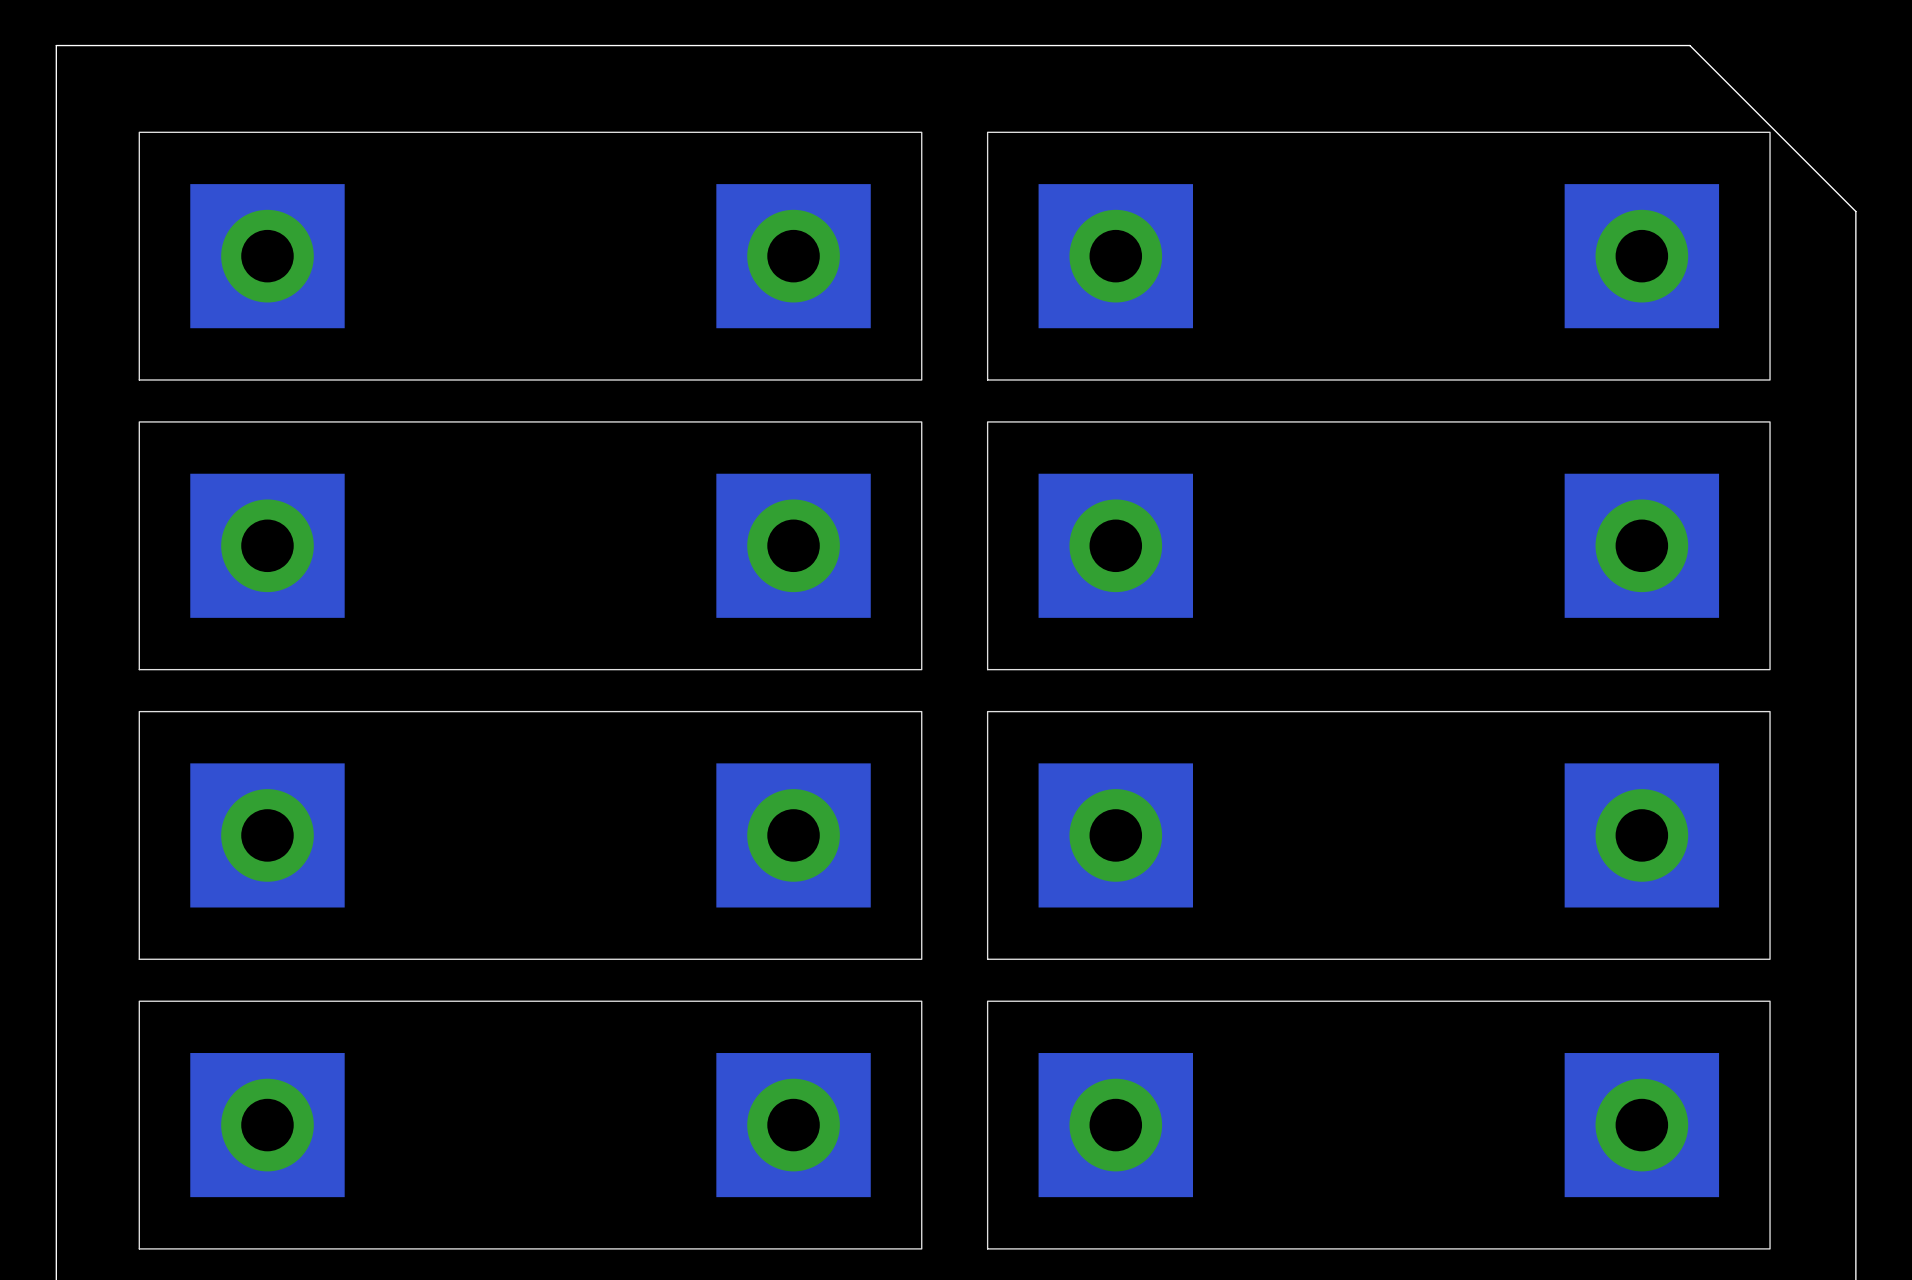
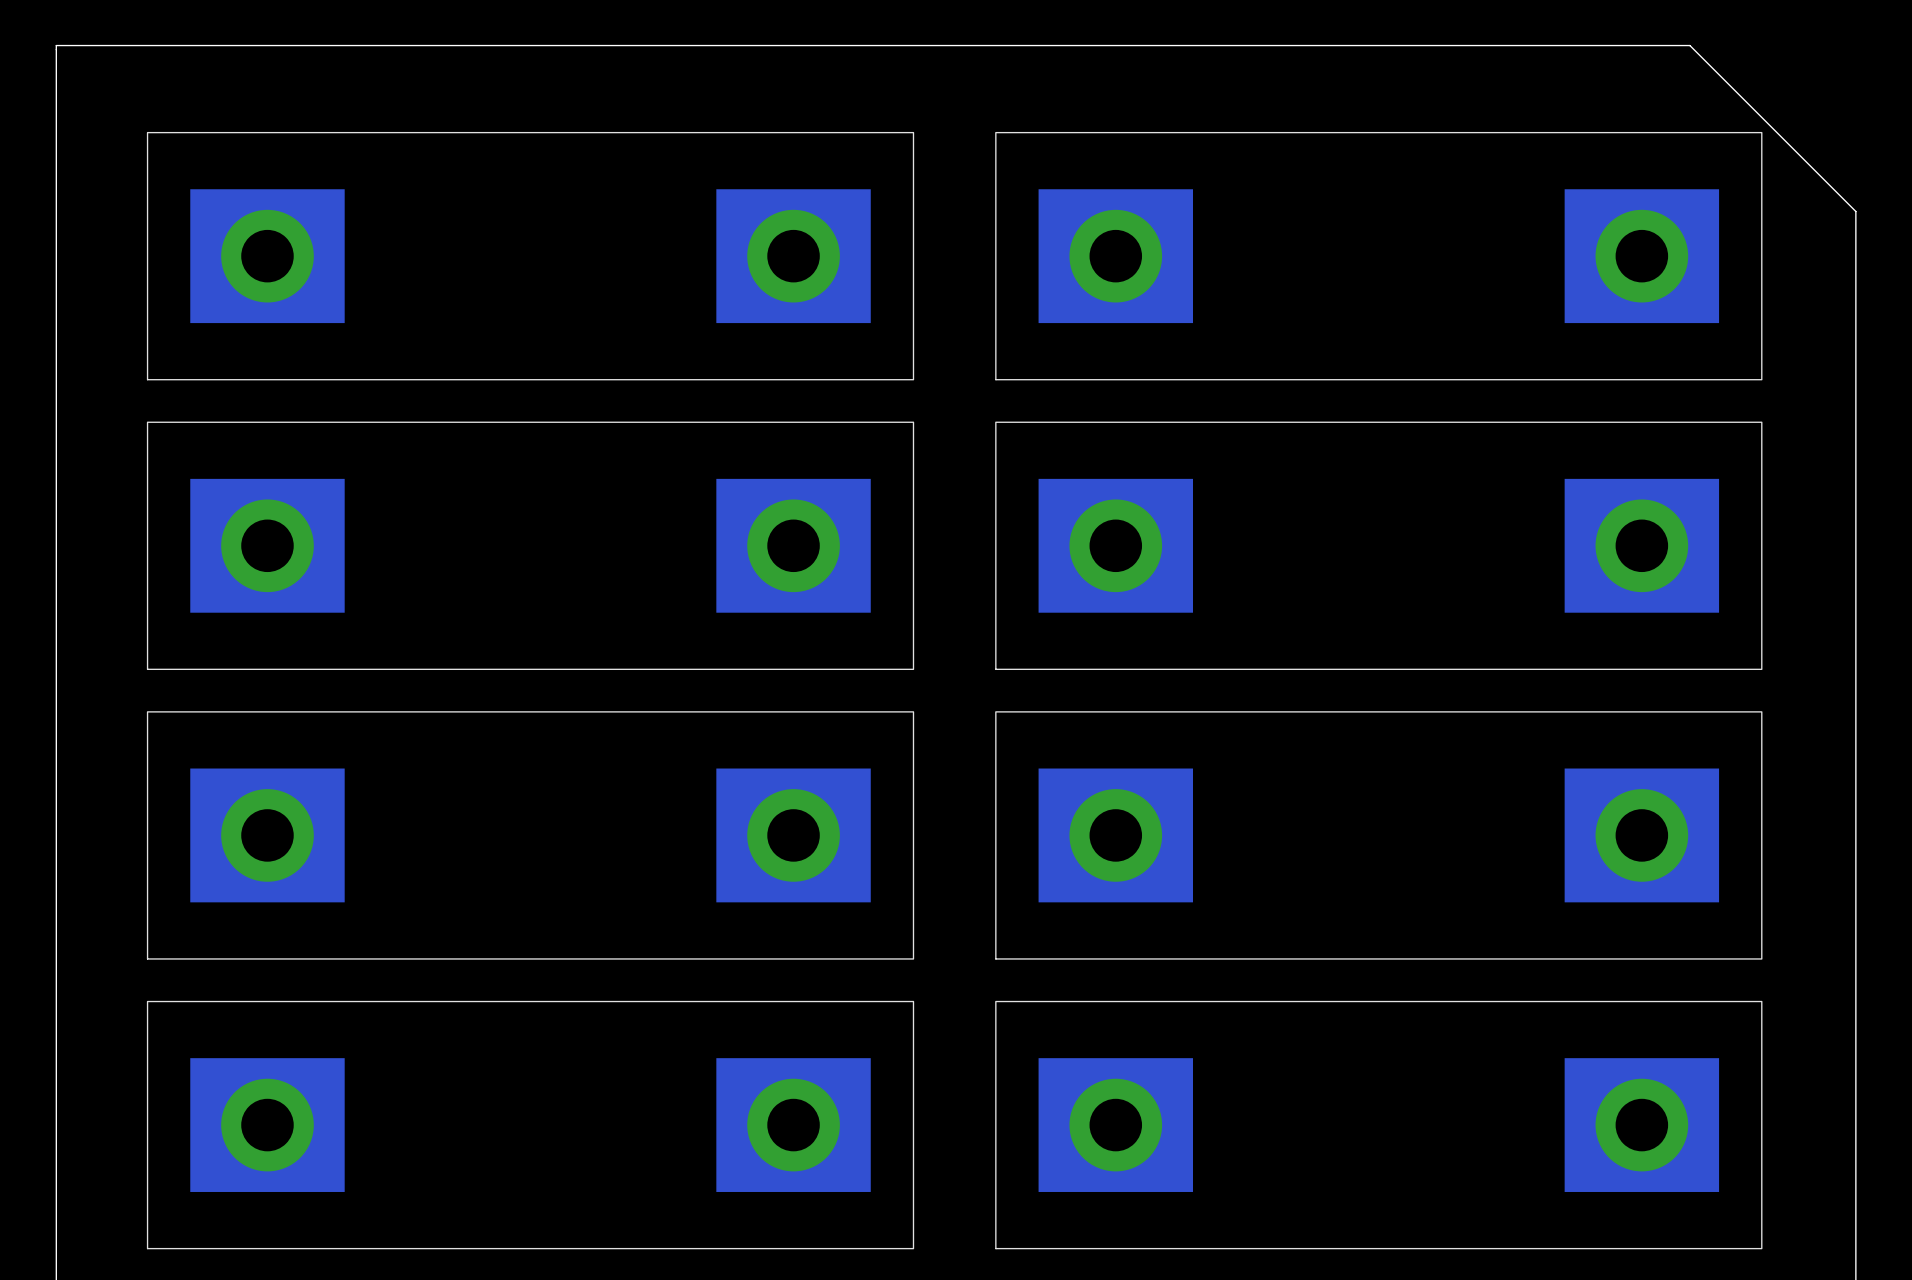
part footprint: [138, 131, 923, 381] -> [146, 132, 915, 381]
part footprint: [986, 131, 1771, 381] -> [995, 132, 1763, 381]
part footprint: [138, 421, 923, 671] -> [146, 421, 915, 670]
part footprint: [986, 421, 1771, 671] -> [995, 421, 1763, 670]
part footprint: [138, 710, 923, 960] -> [146, 711, 915, 960]
part footprint: [986, 710, 1771, 960] -> [995, 711, 1763, 960]
part footprint: [138, 1000, 923, 1250] -> [146, 1000, 915, 1250]
part footprint: [986, 1000, 1771, 1250] -> [995, 1000, 1763, 1250]

